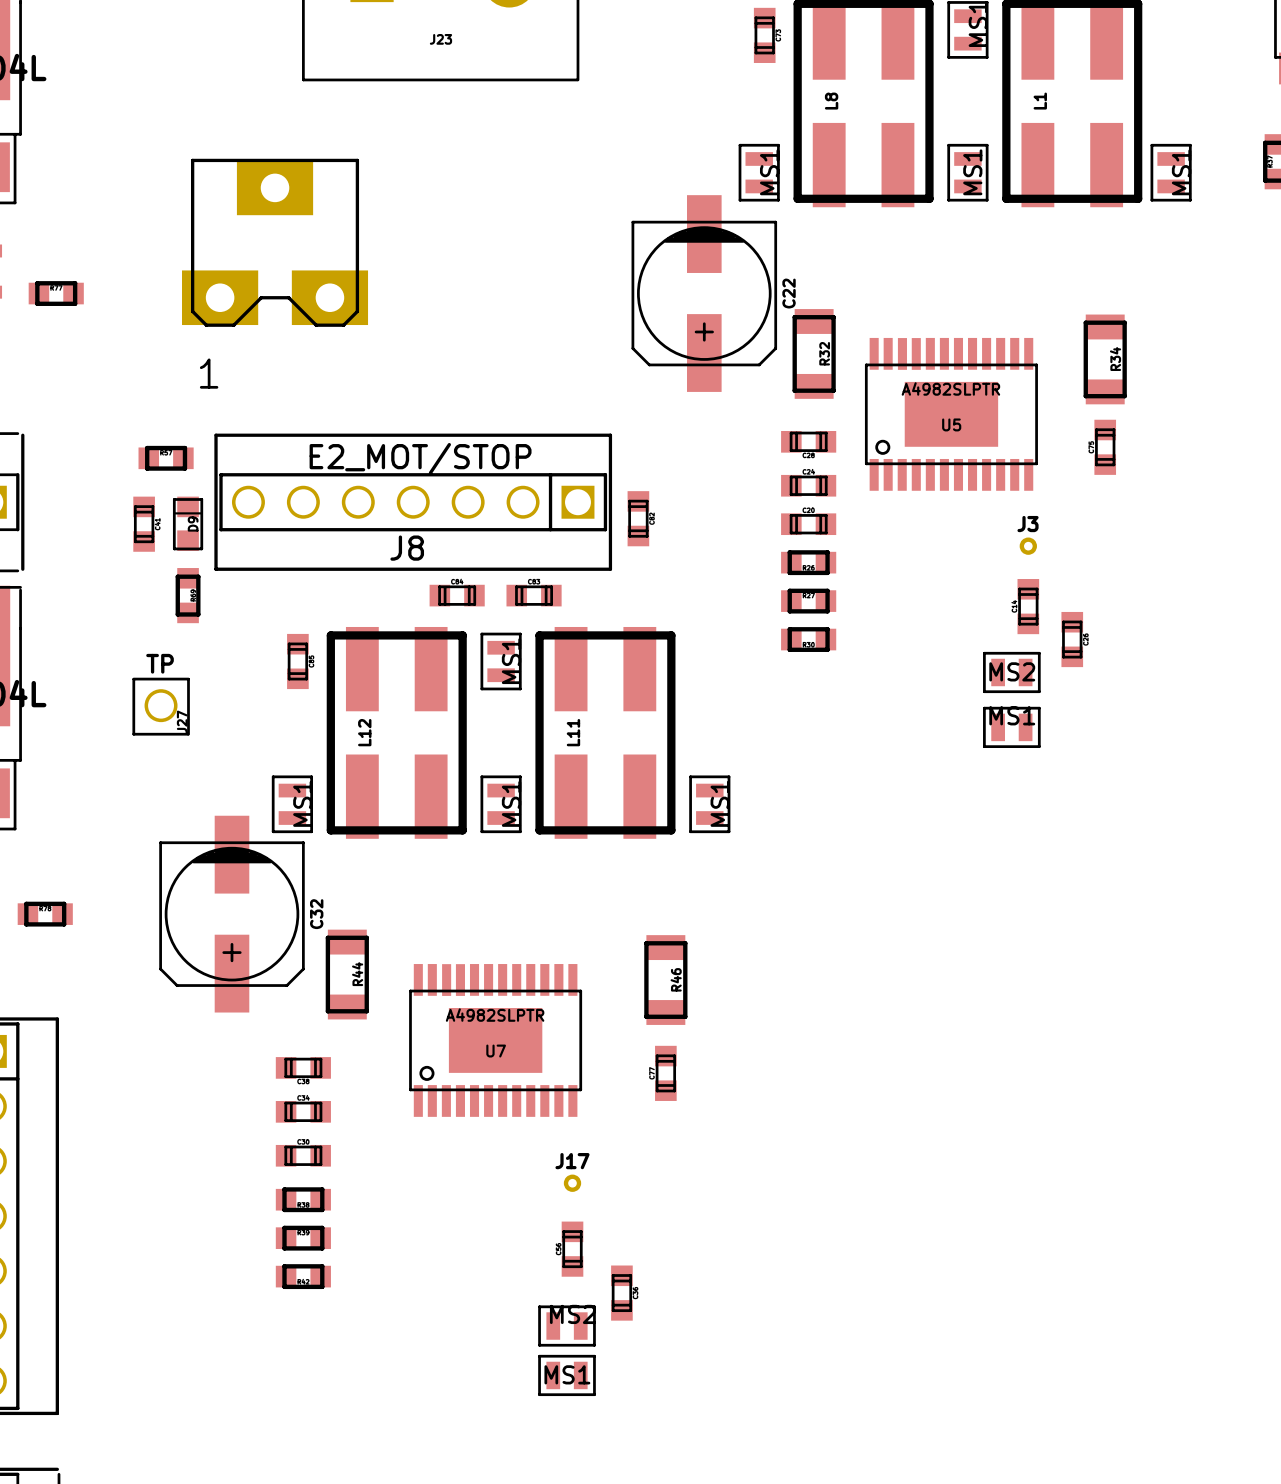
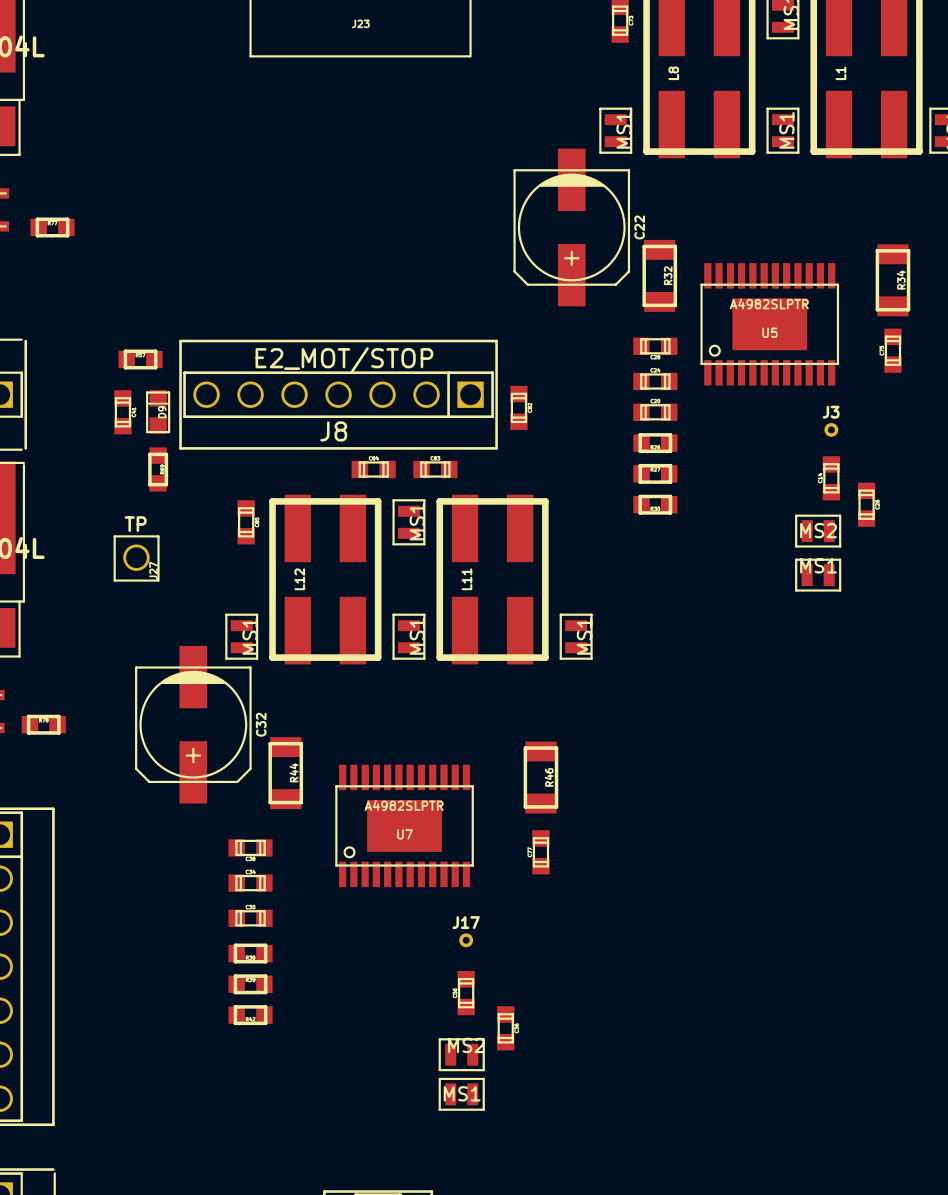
part: (275, 242) -> none

